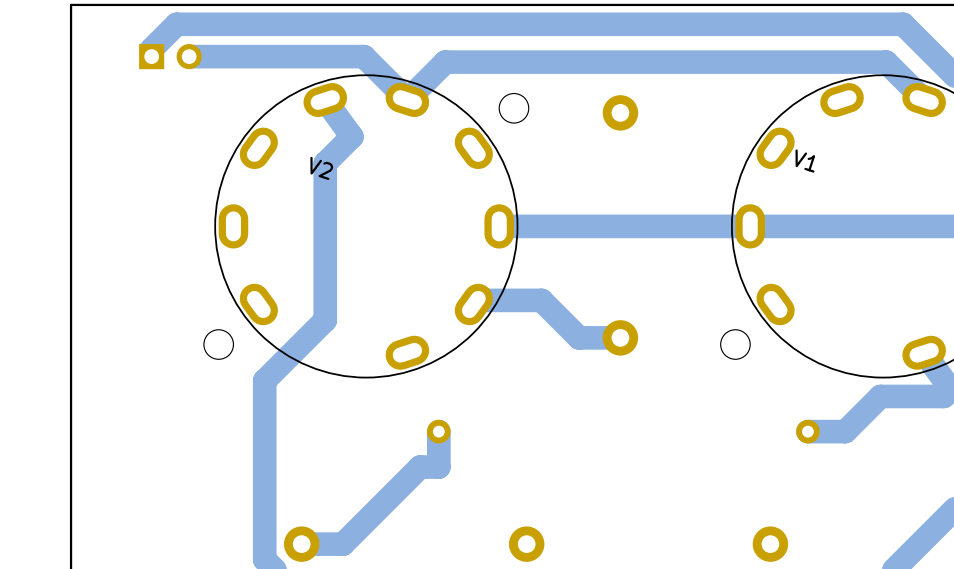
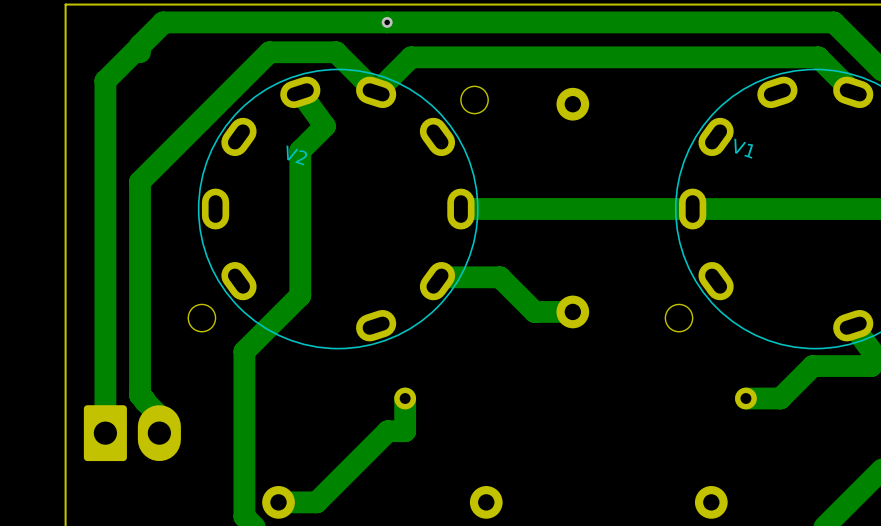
via: none -> (387, 22)
track: none -> (163, 23) (105, 80) (105, 415)
part: (170, 56) -> none
track: (291, 56) (189, 56) -> (269, 52) (140, 181) (140, 395) (159, 415)
part: none -> (132, 433)

